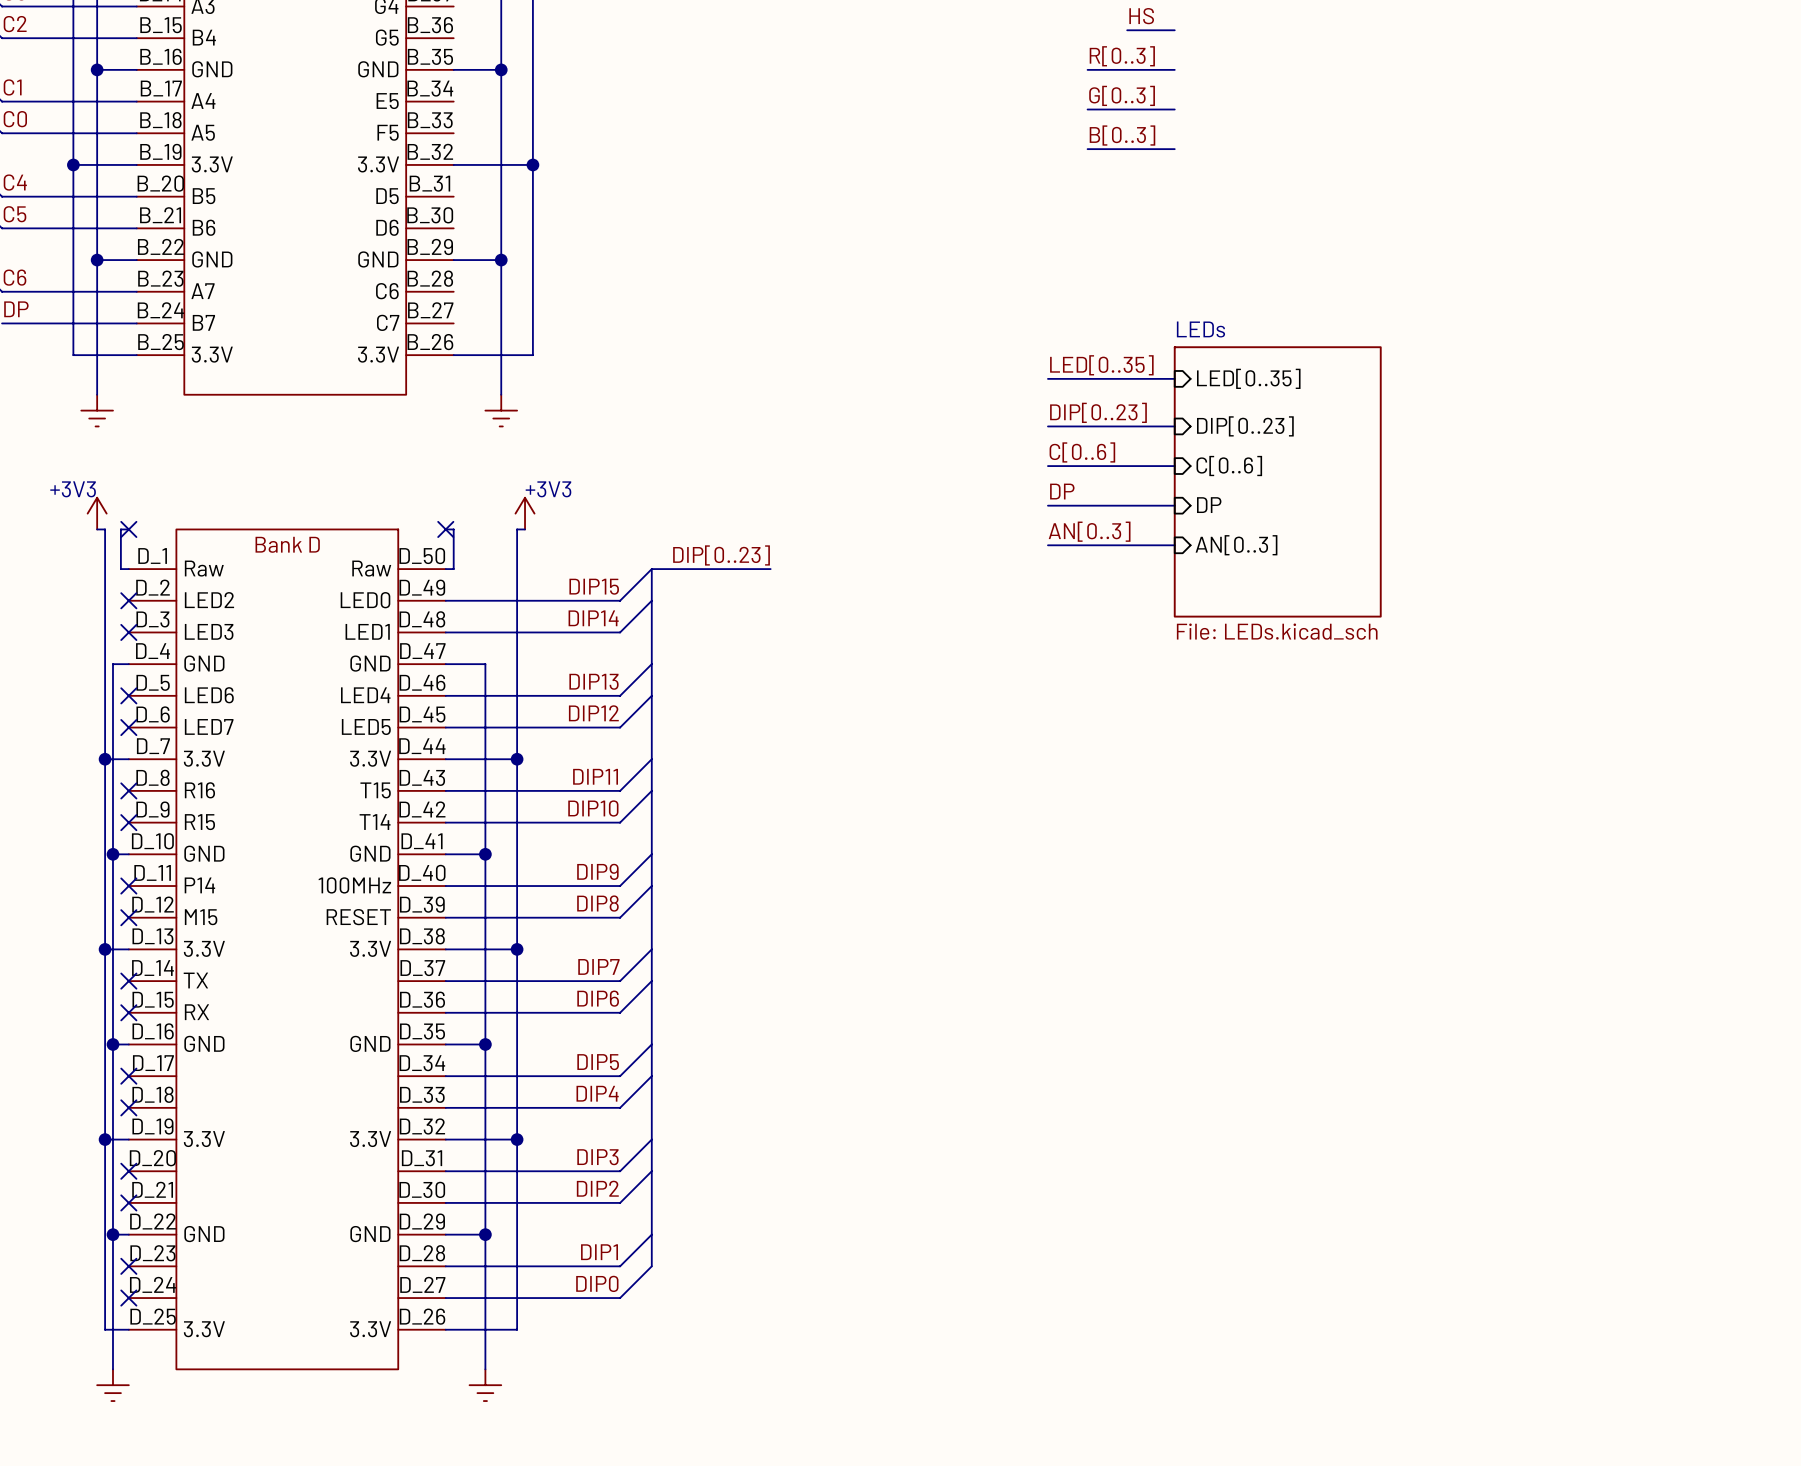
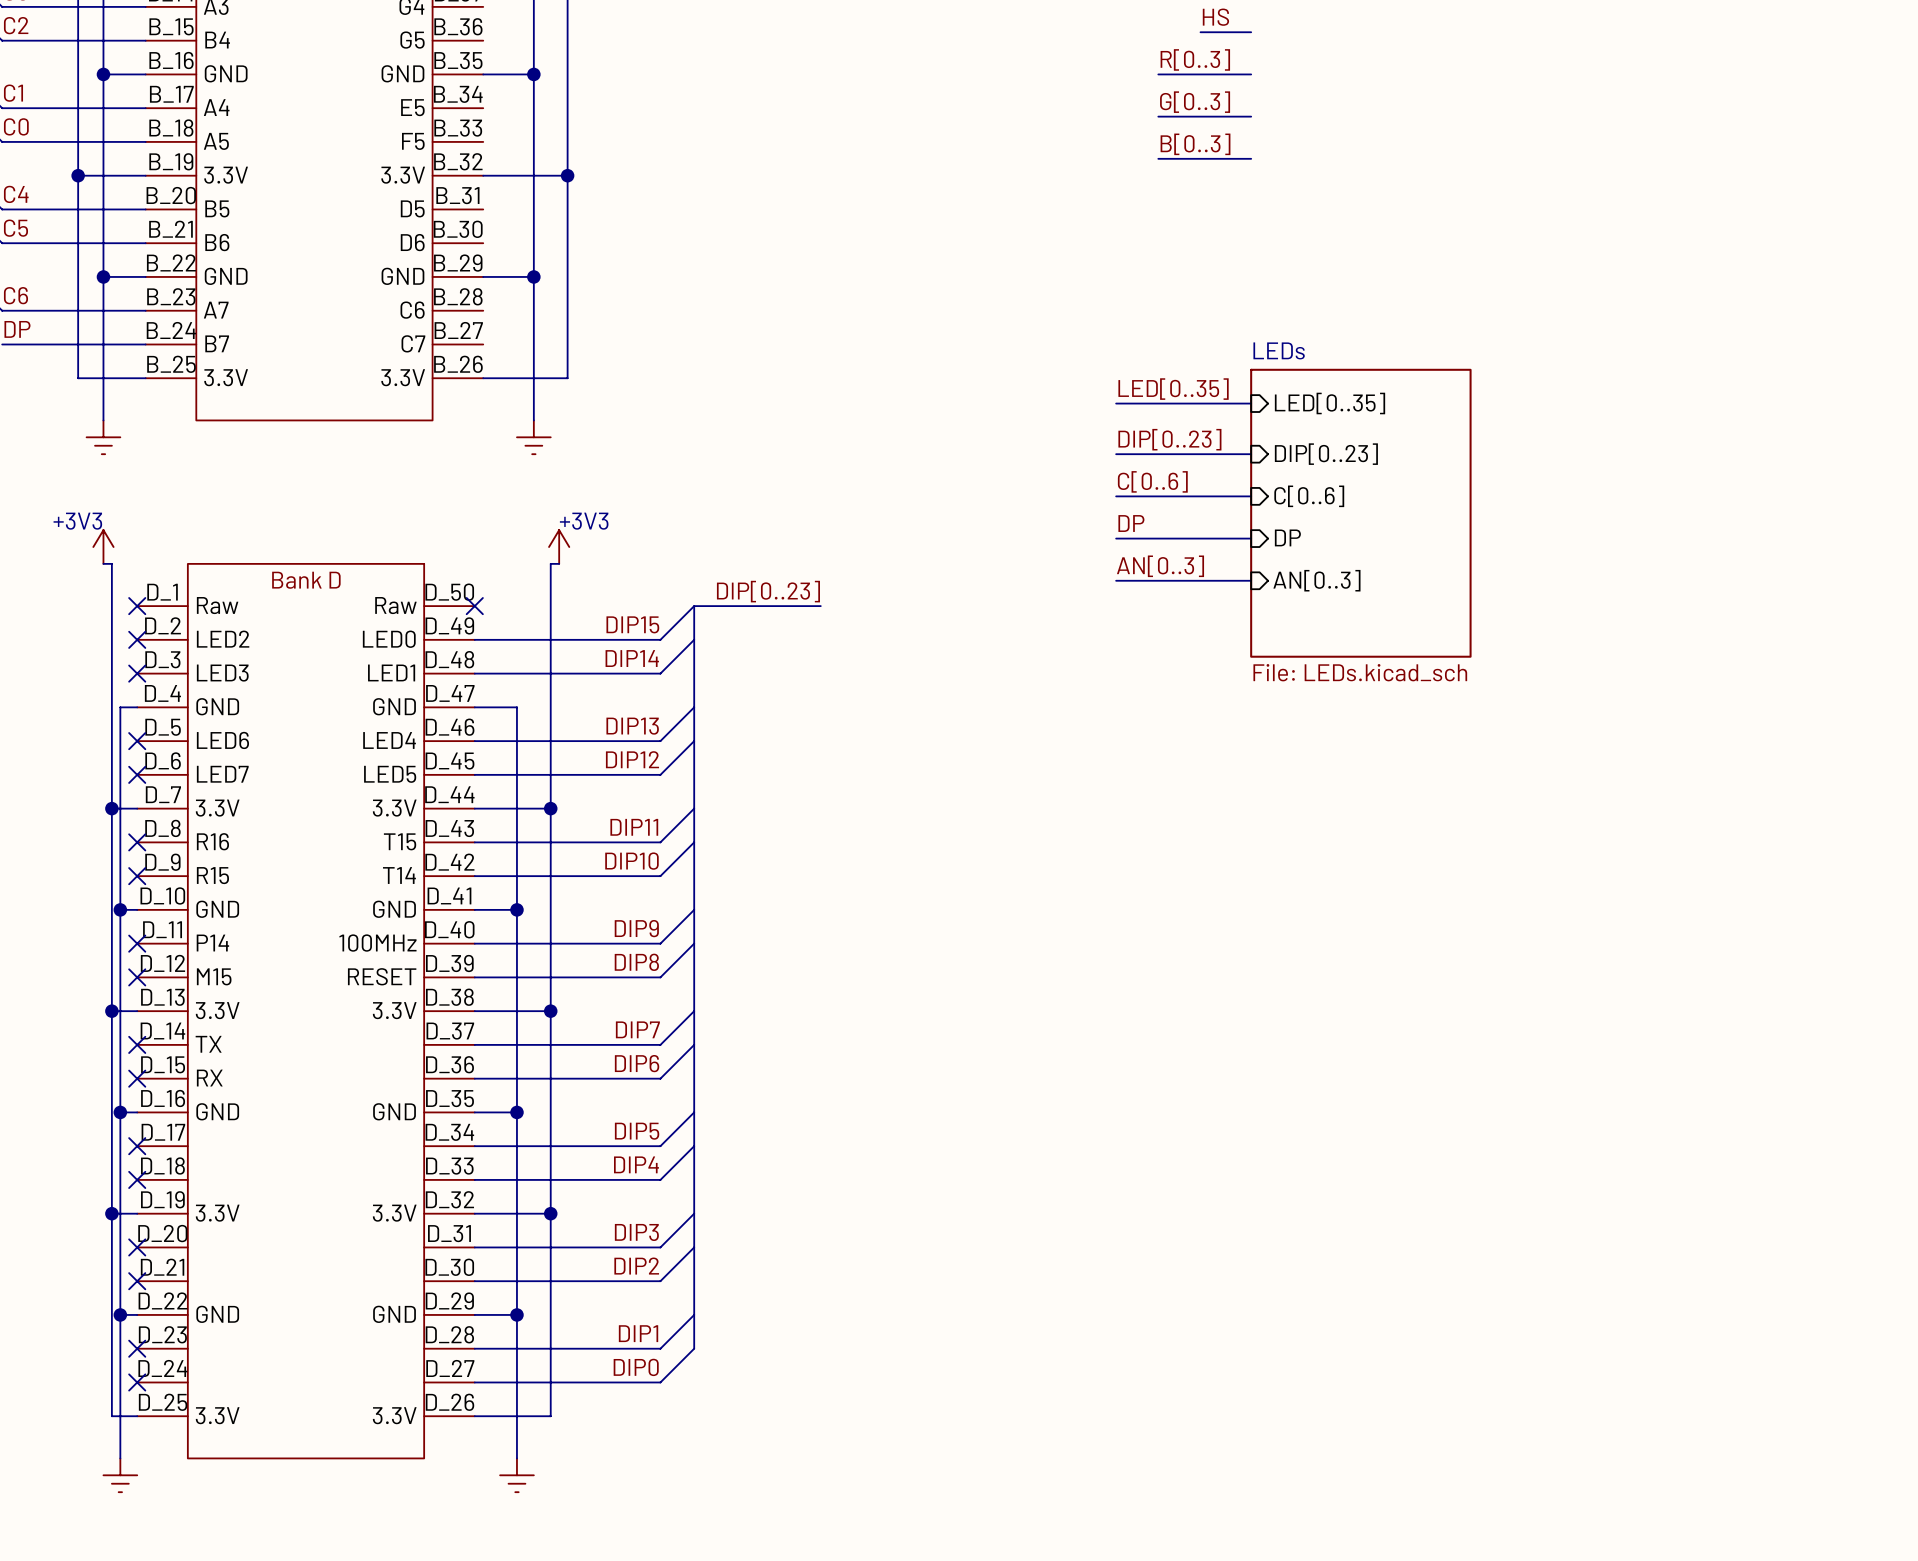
wire: (128, 529) (120, 529) (120, 569) (128, 569) -> none
no-connect mark position: (128, 529) -> (137, 606)
wire: (445, 529) (453, 529) (453, 569) (445, 569) -> none
no-connect mark position: (445, 529) -> (474, 606)

